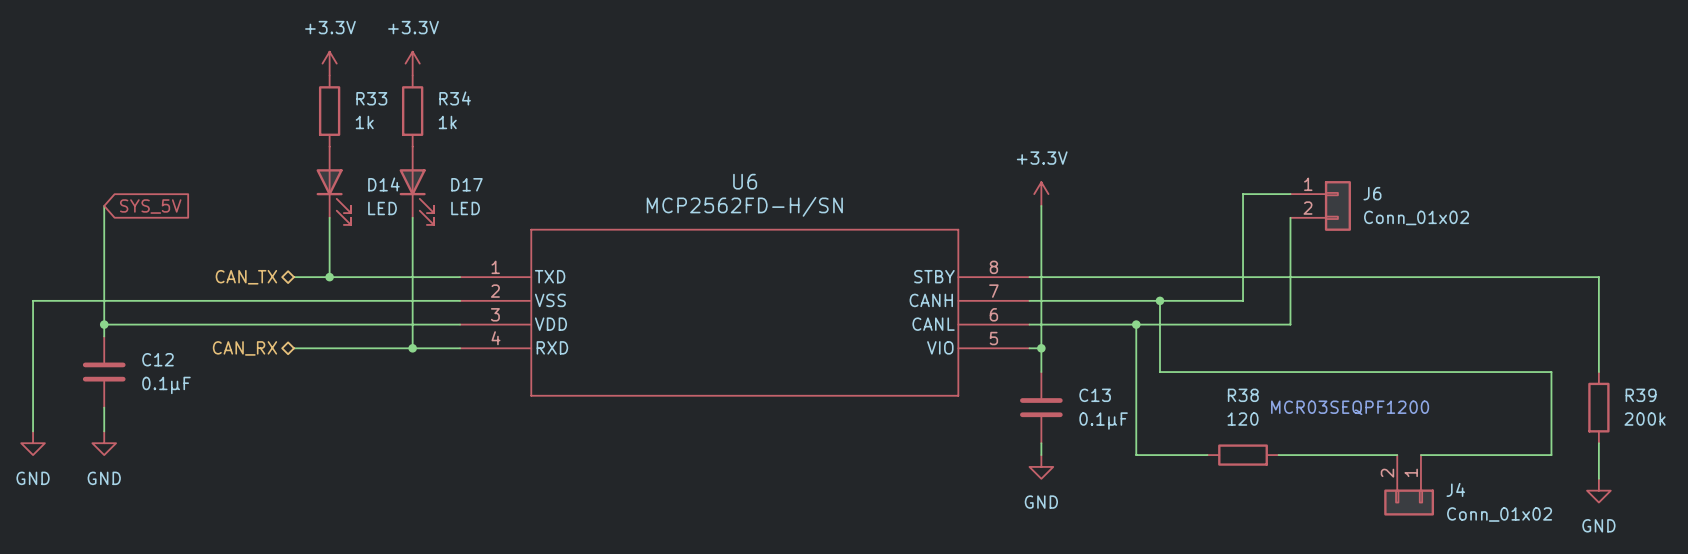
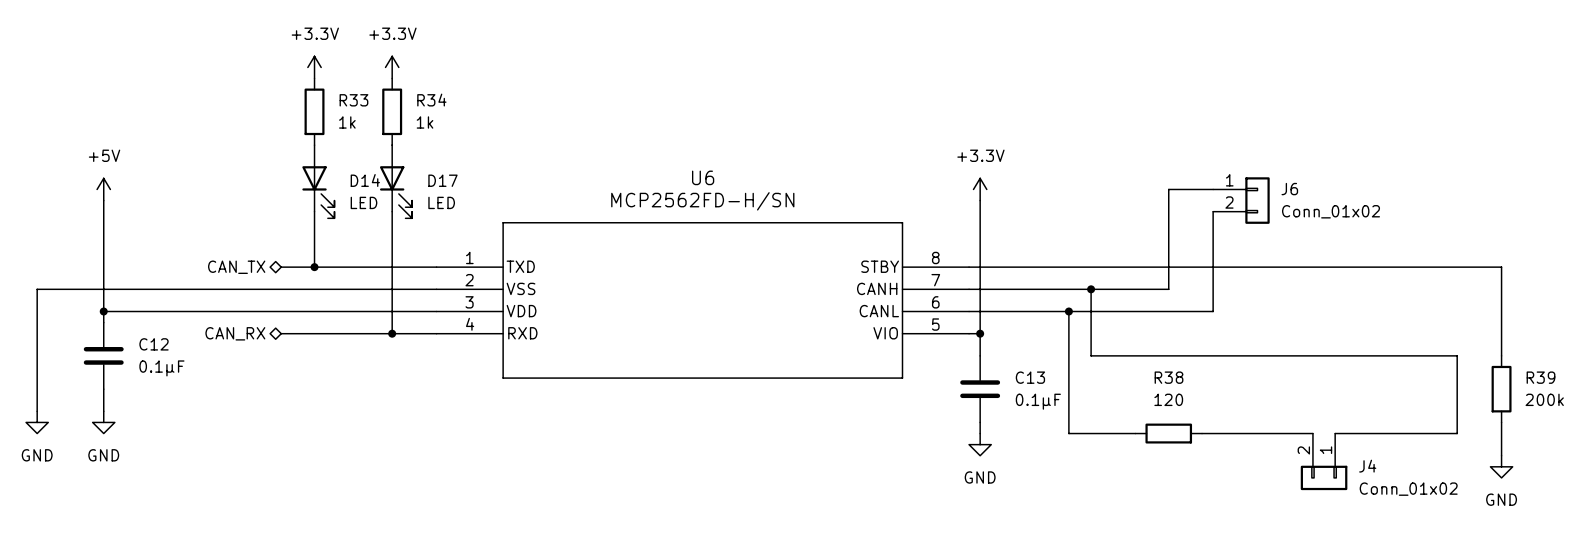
power symbol: none -> +5V (103, 189)
global label: SYS_5V (150, 206) -> none
text: MCR03SEQPF1200 (1350, 407) -> none

